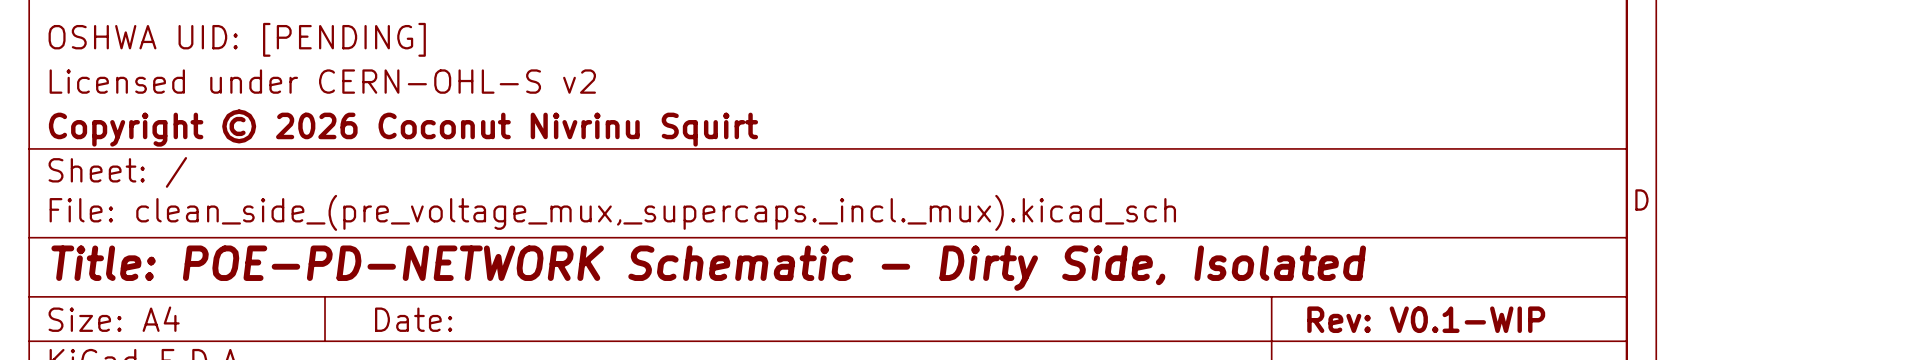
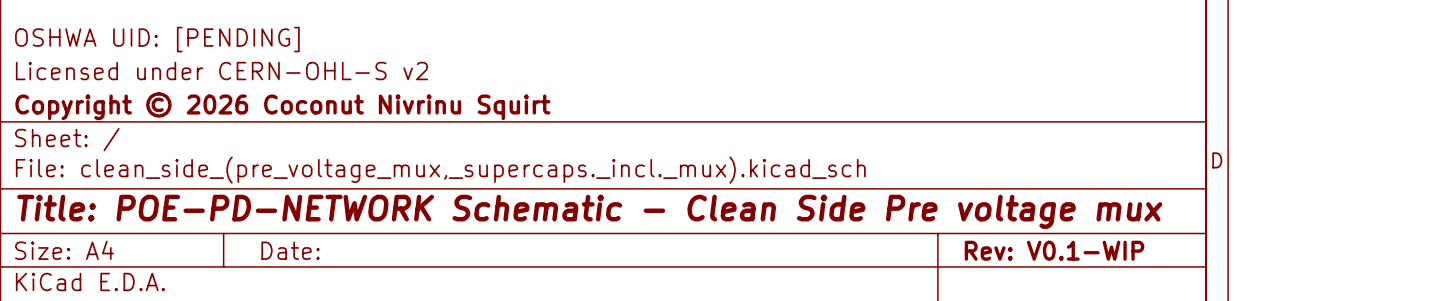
title block: Title: POE-PD-NETWORK Schematic - Dirty Side, Isolated (708, 268) -> Title: POE-PD-NETWORK Schematic - Clean Side Pre voltage mux (589, 211)

